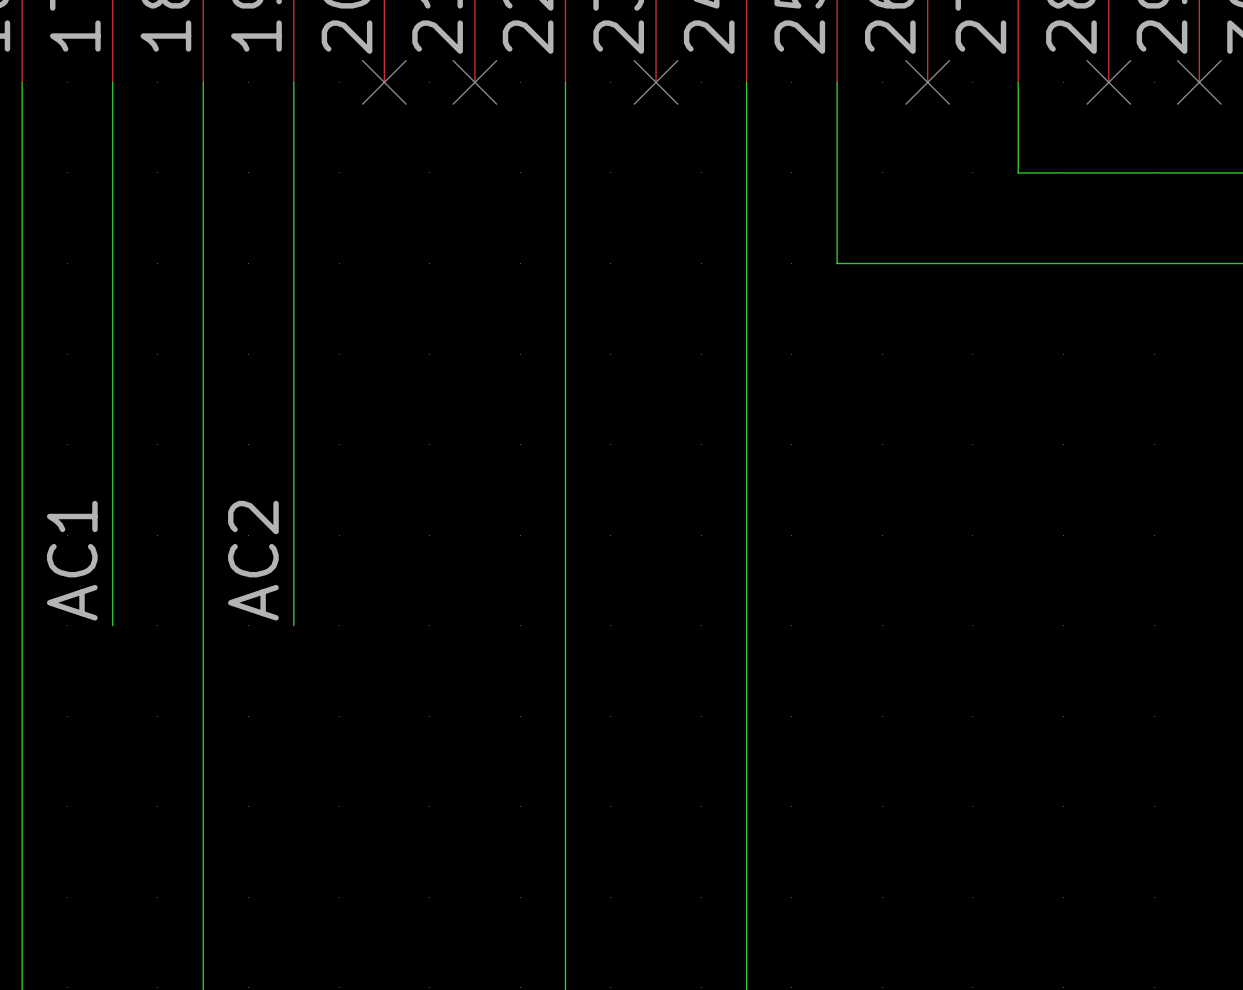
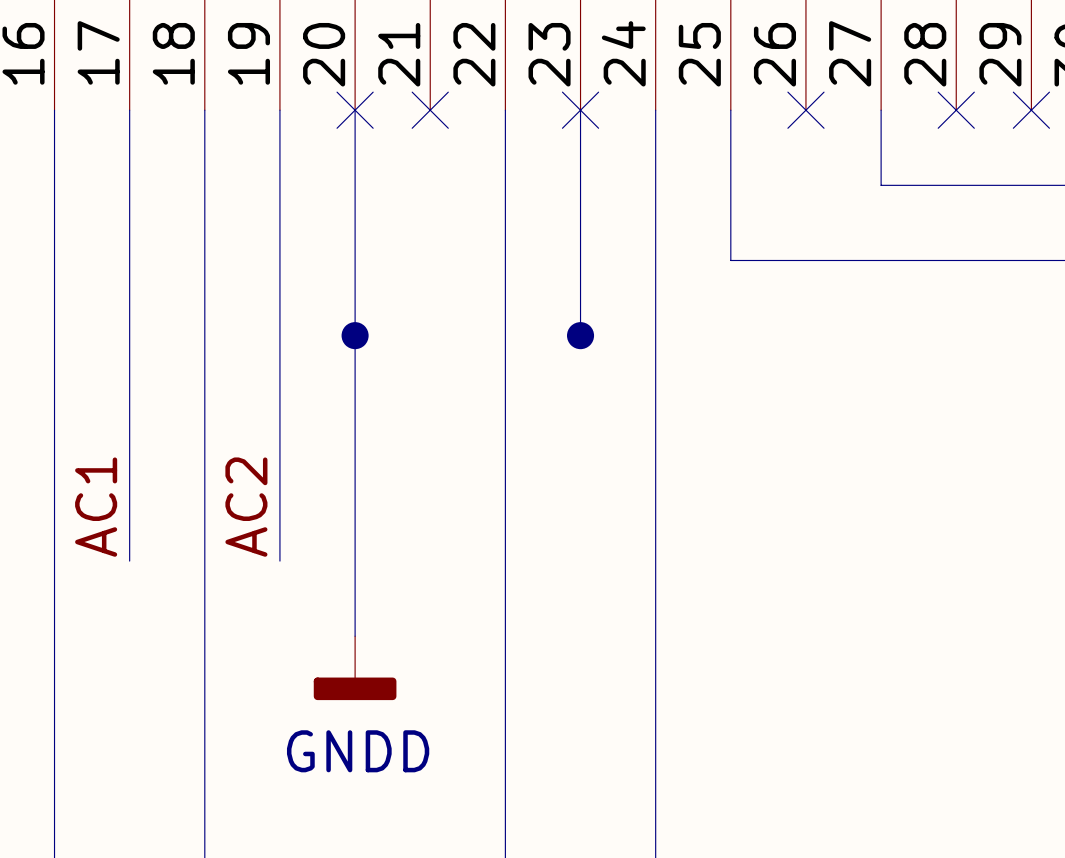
wire: none -> (355, 110) (355, 636)
wire: none -> (580, 110) (580, 335)
junction: none -> (355, 335)
junction: none -> (580, 335)
power symbol: none -> GNDD (355, 668)

